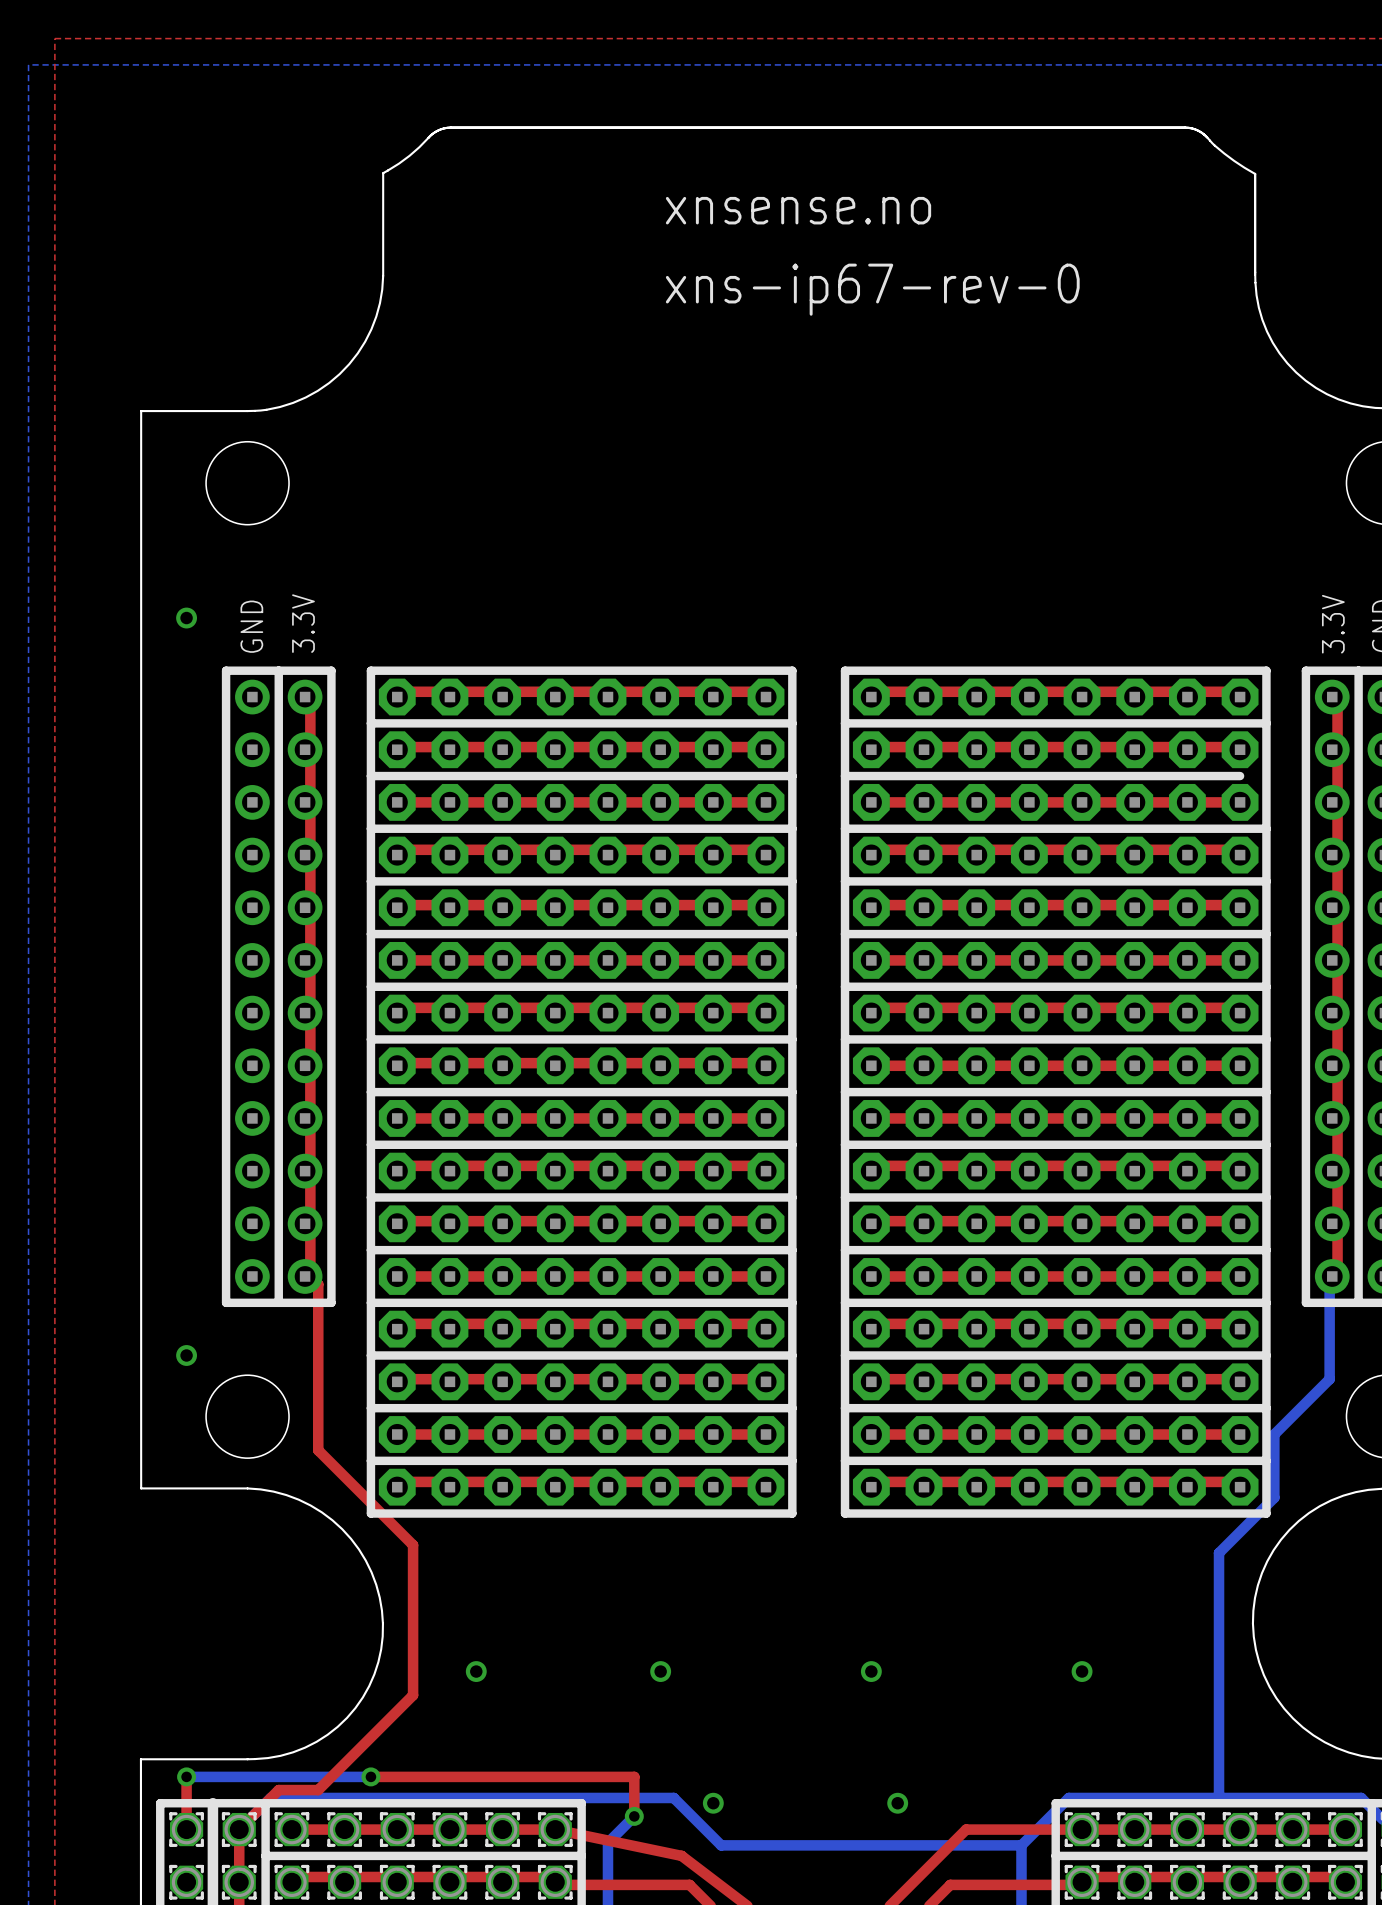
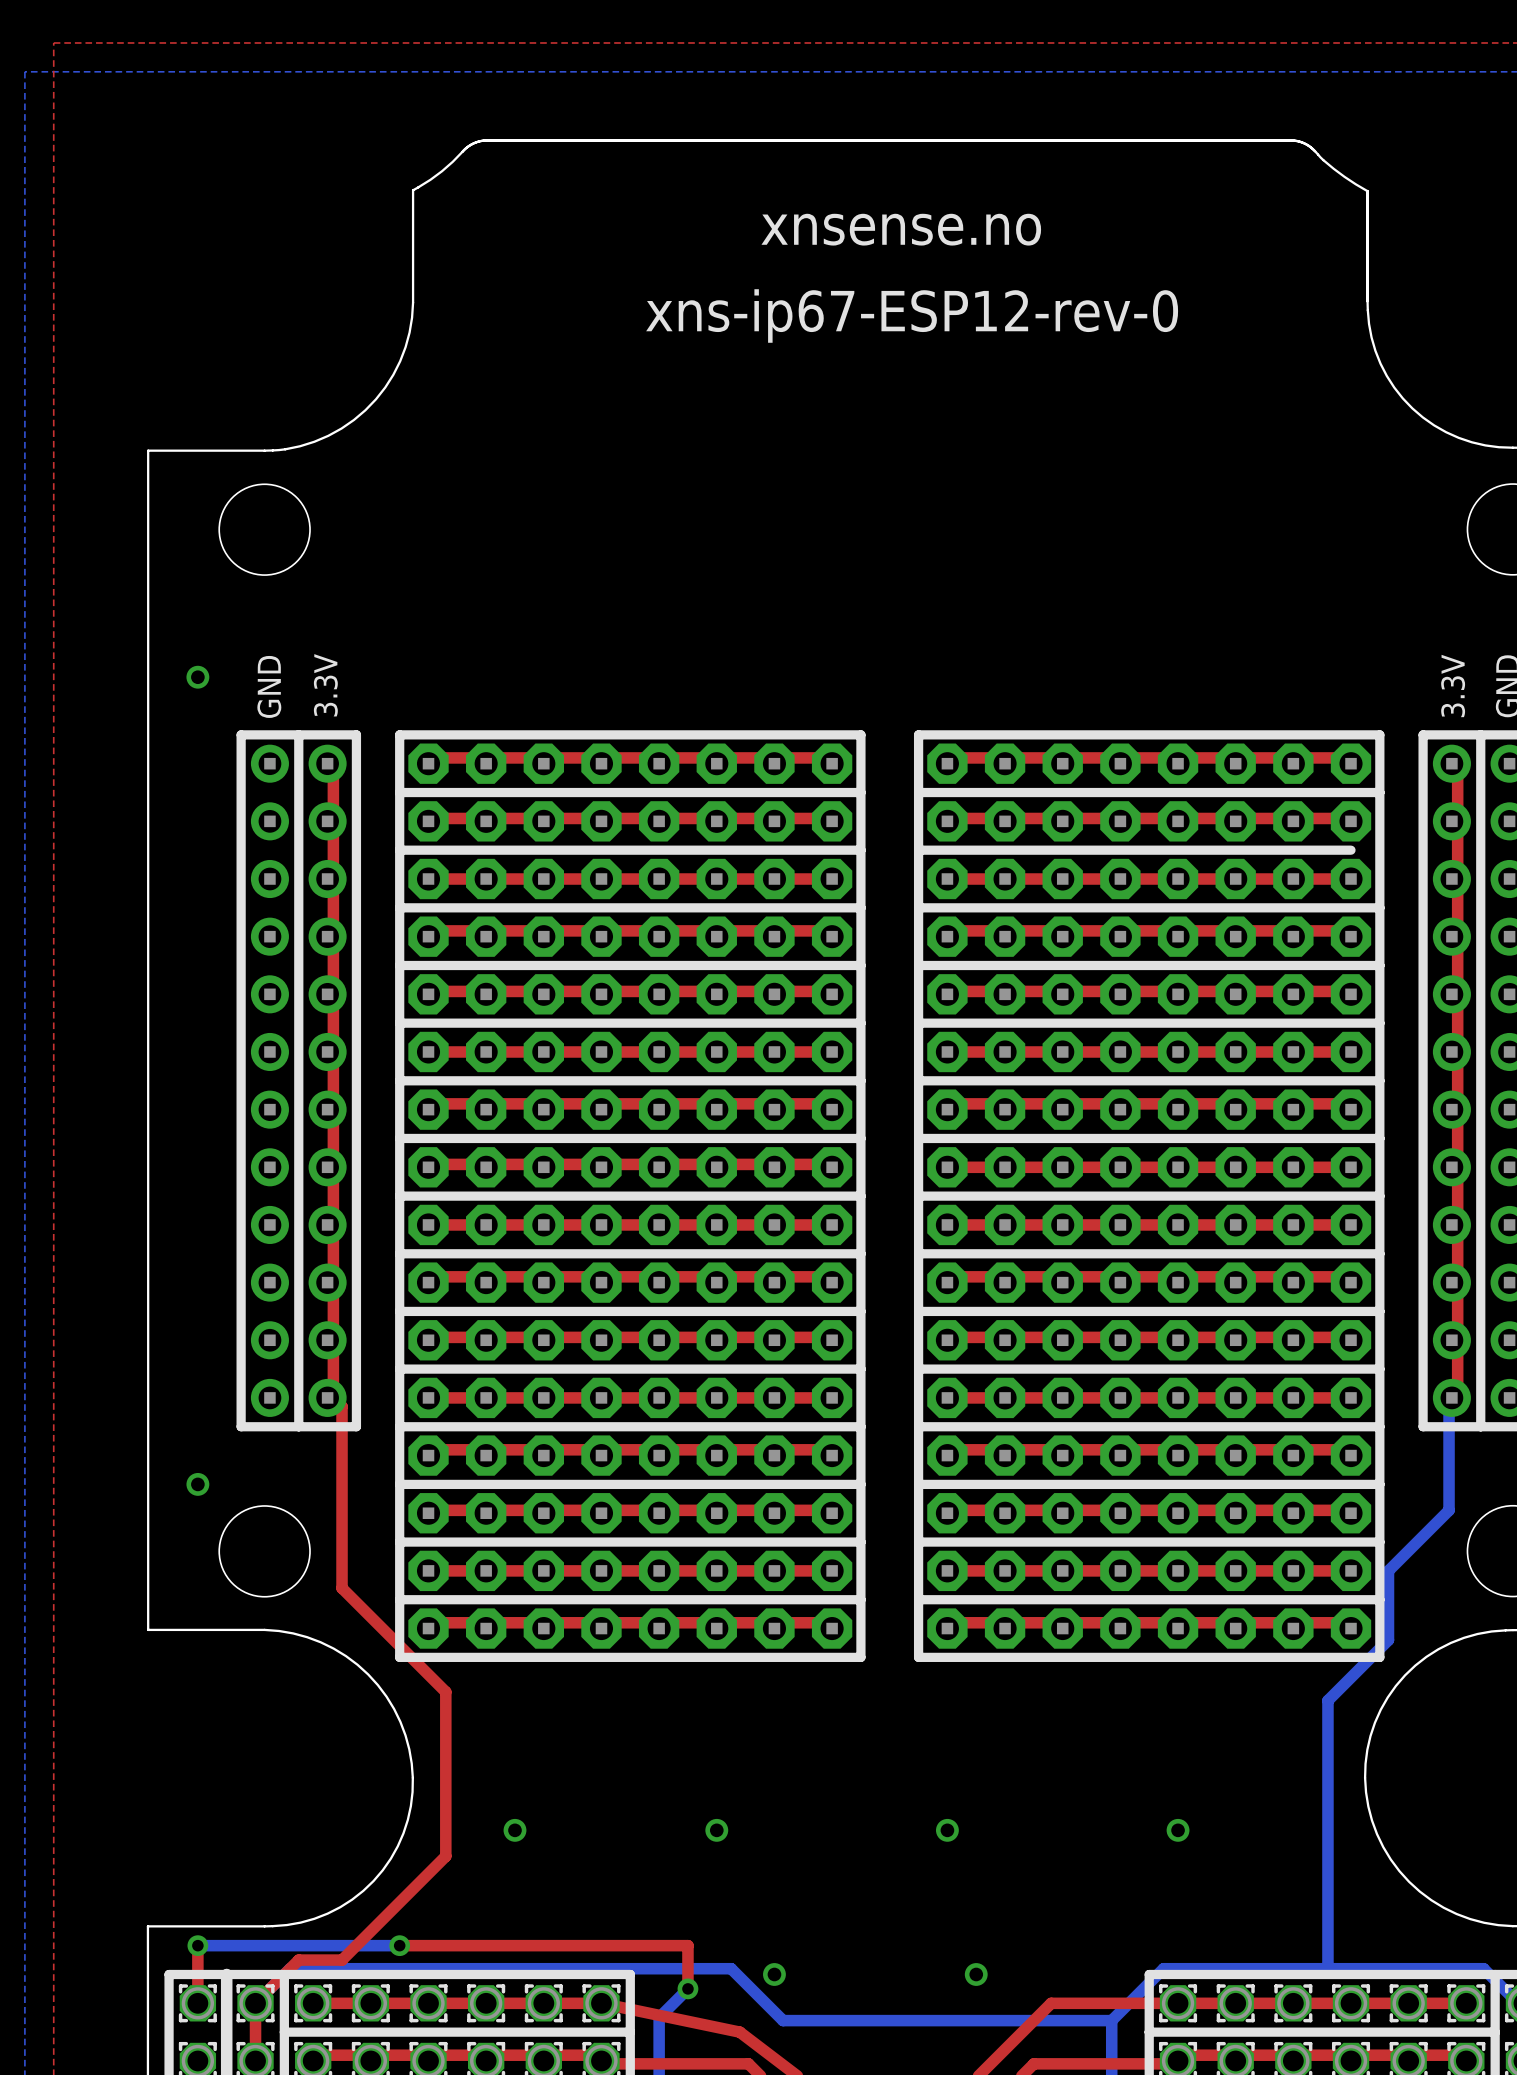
text position: xnsense.no (798, 210) -> xnsense.no (901, 229)
text: xns-ip67-rev-0 (872, 289) -> xns-ip67-ESP12-rev-0 (912, 315)

